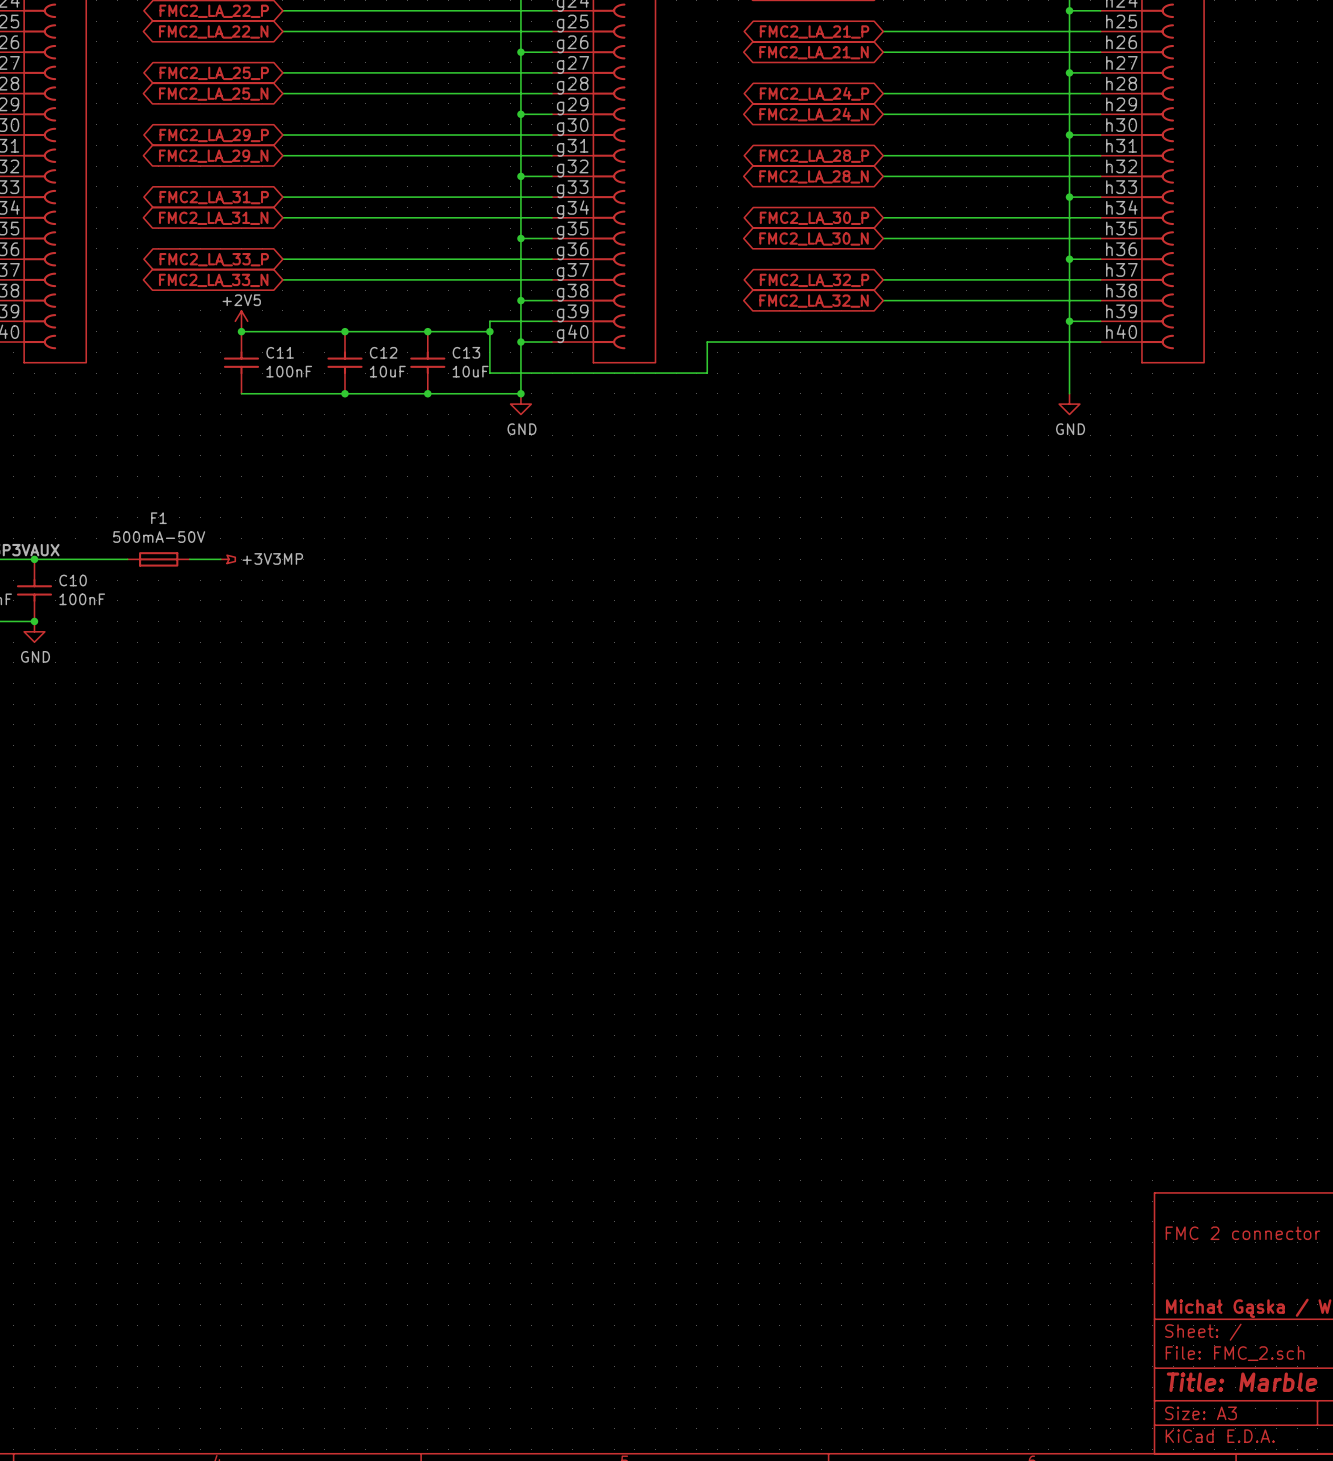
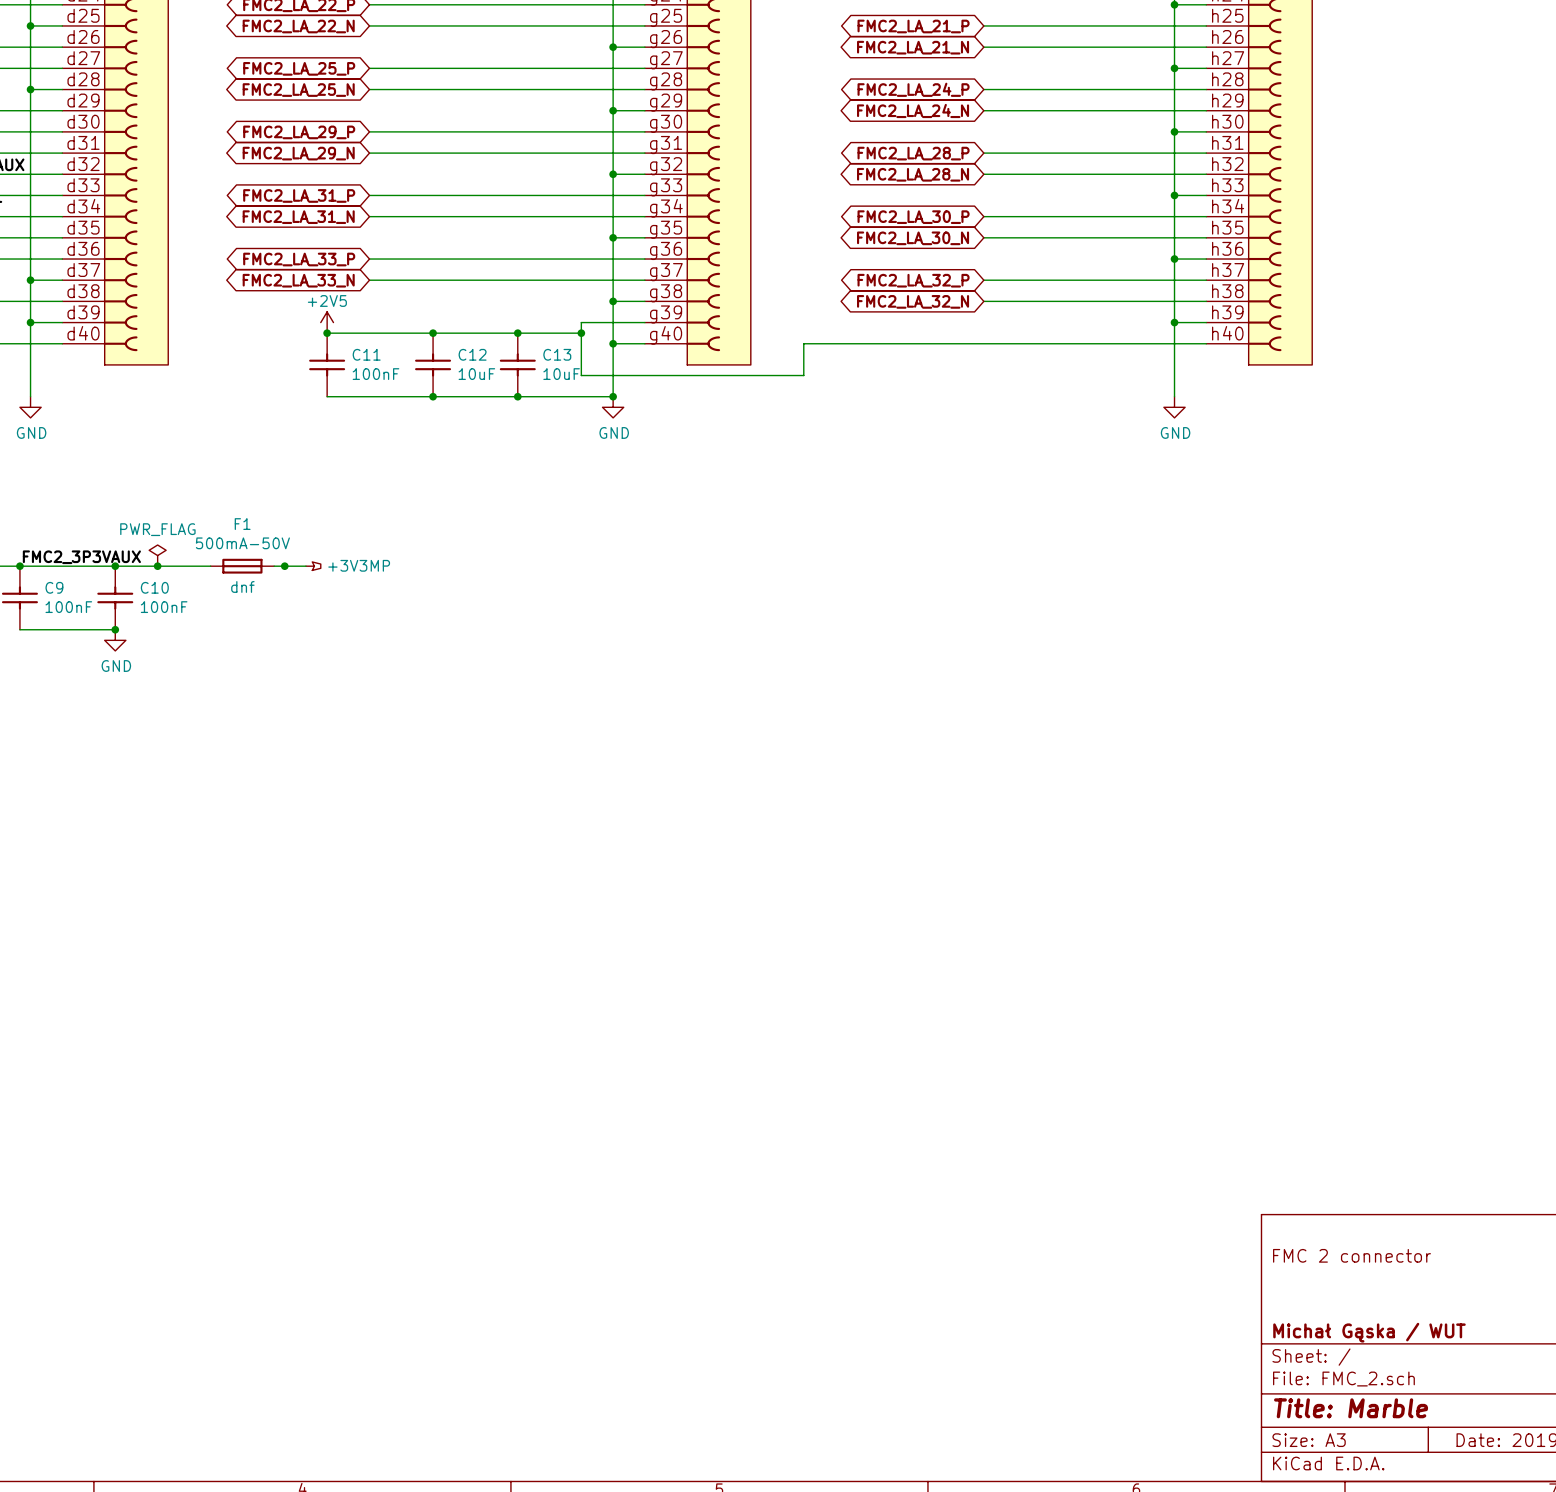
power symbol: none -> PWR_FLAG (157, 555)
junction: none -> (157, 566)
junction: none -> (284, 566)
F1 text: none -> dnf (242, 586)

